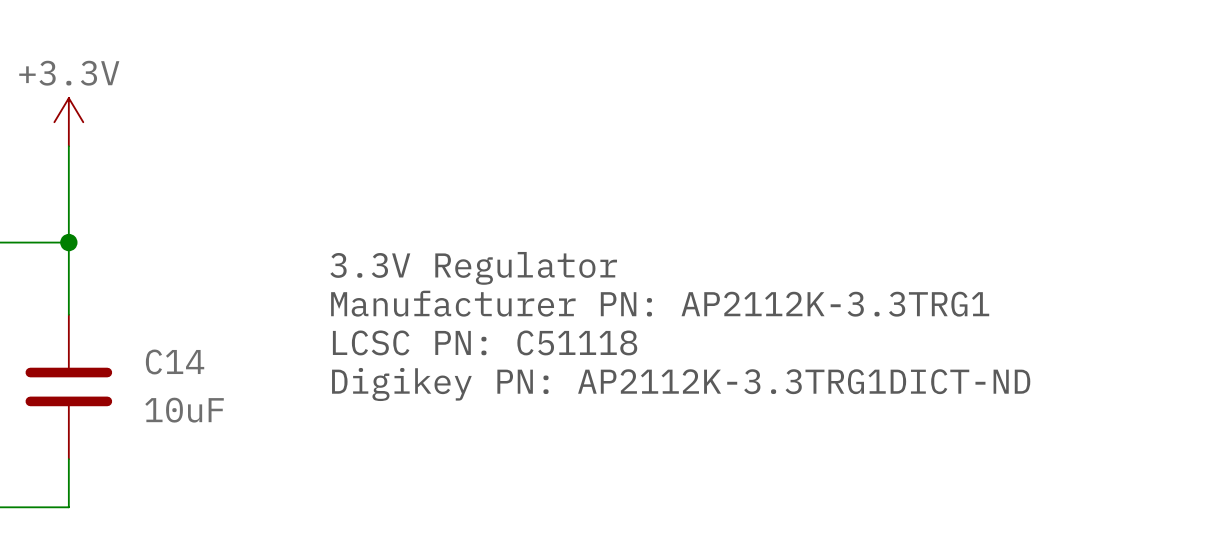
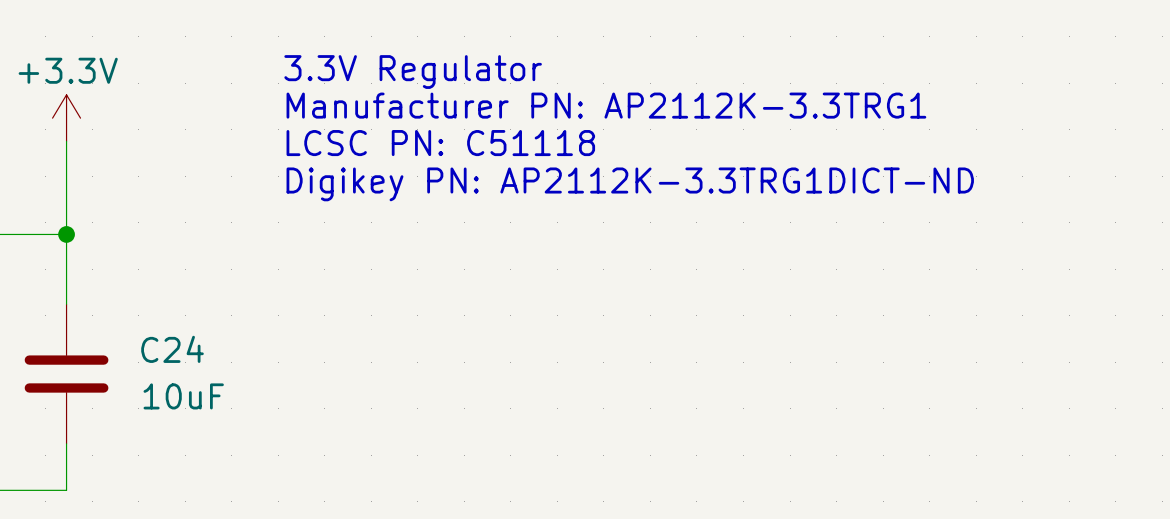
text position: 3.3V Regulator (473, 268) -> 3.3V Regulator (413, 72)
text position: Manufacturer PN: AP2112K-3.3TRG1 (660, 303) -> Manufacturer PN: AP2112K-3.3TRG1 (606, 105)
text position: LCSC PN: C51118 (485, 342) -> LCSC PN: C51118 (440, 143)
C14 name: C14 (175, 361) -> C24 (172, 349)
text position: Digikey PN: AP2112K-3.3TRG1DICT-ND (681, 384) -> Digikey PN: AP2112K-3.3TRG1DICT-ND (630, 184)

